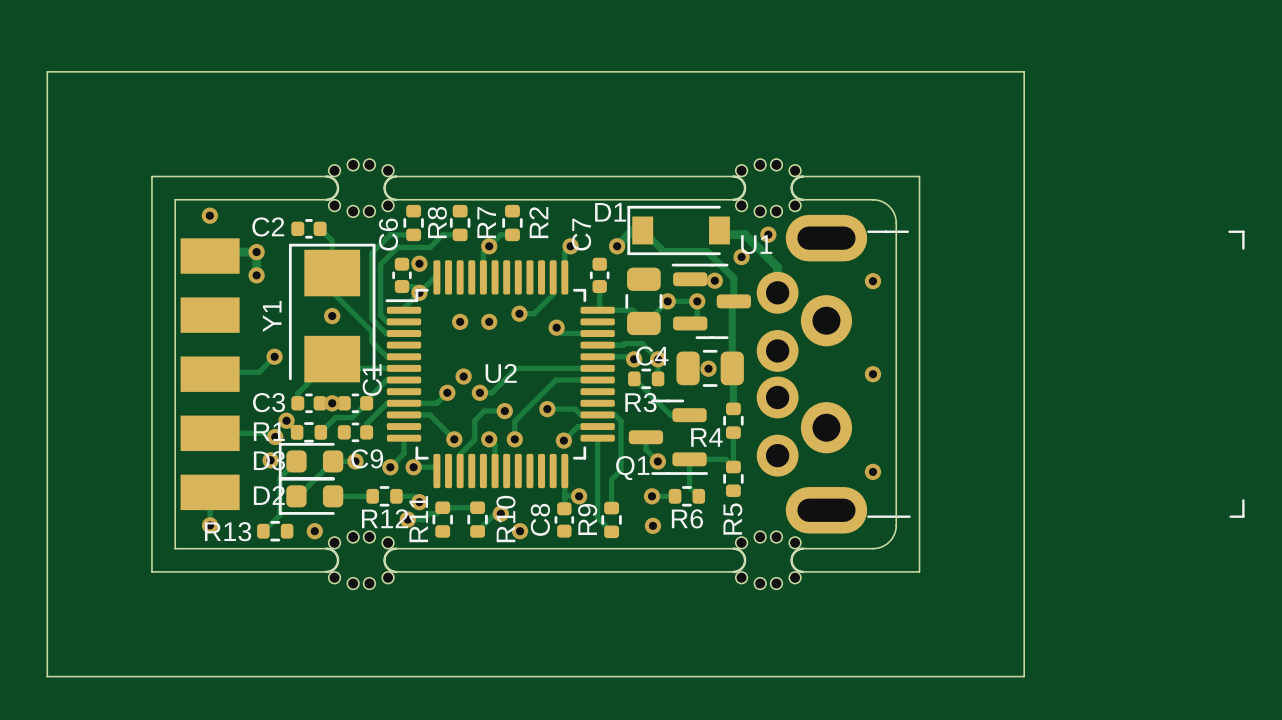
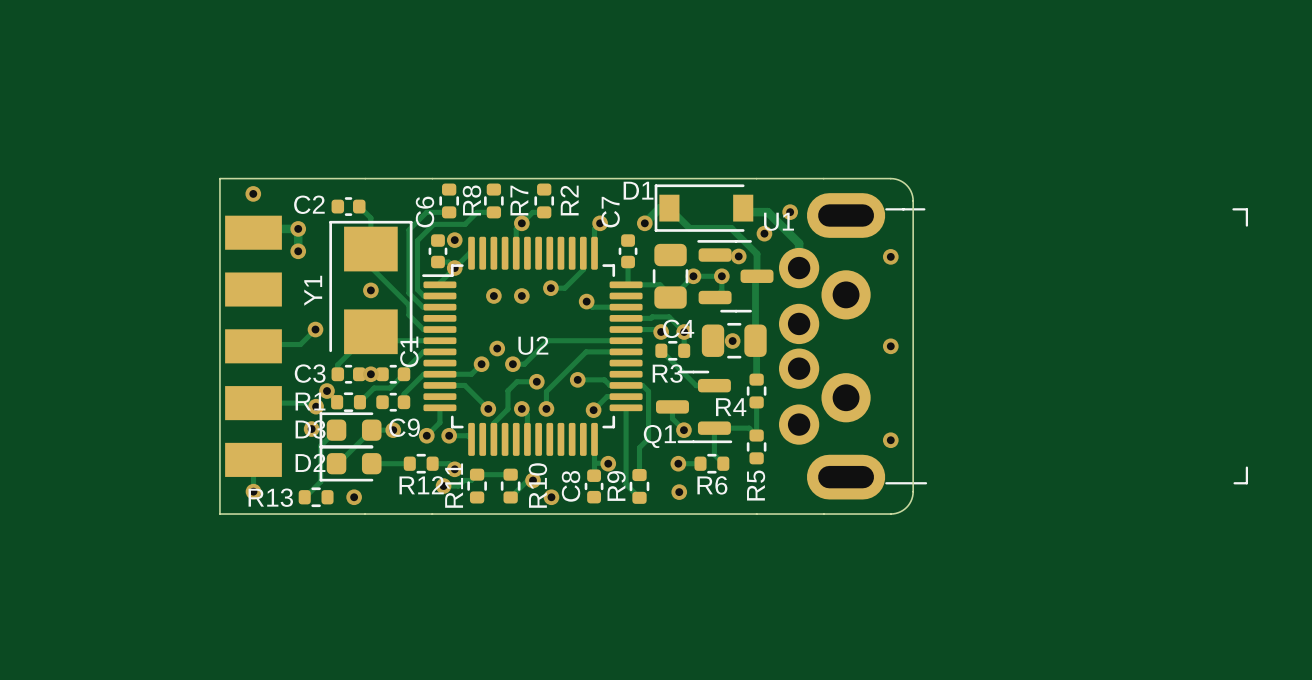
board edge: (47, 71) (1024, 71) (1024, 676) (47, 676) (47, 71) -> none
part: (361, 188) -> none
part: (768, 188) -> none
board edge: (326, 199) (333, 197) (337, 189) (335, 181) (327, 176) (151, 176) (151, 571) (327, 571) (335, 567) (337, 558) (333, 551) (326, 548) -> (365, 178) (432, 178)
board edge: (396, 199) (387, 196) (384, 188) (387, 179) (396, 176) (734, 176) (741, 179) (745, 188) (741, 196) (733, 199) -> none
board edge: (803, 199) (796, 197) (791, 189) (793, 181) (800, 176) (919, 176) (919, 571) (800, 571) (793, 567) (791, 558) (796, 551) (803, 548) -> (823, 178) (756, 178)
board edge: (396, 548) (387, 552) (384, 560) (387, 568) (396, 571) (734, 571) (741, 568) (745, 560) (741, 552) (733, 548) -> (432, 514) (365, 514)
board edge: none -> (756, 514) (823, 514)
part: (361, 560) -> none
part: (768, 560) -> none

